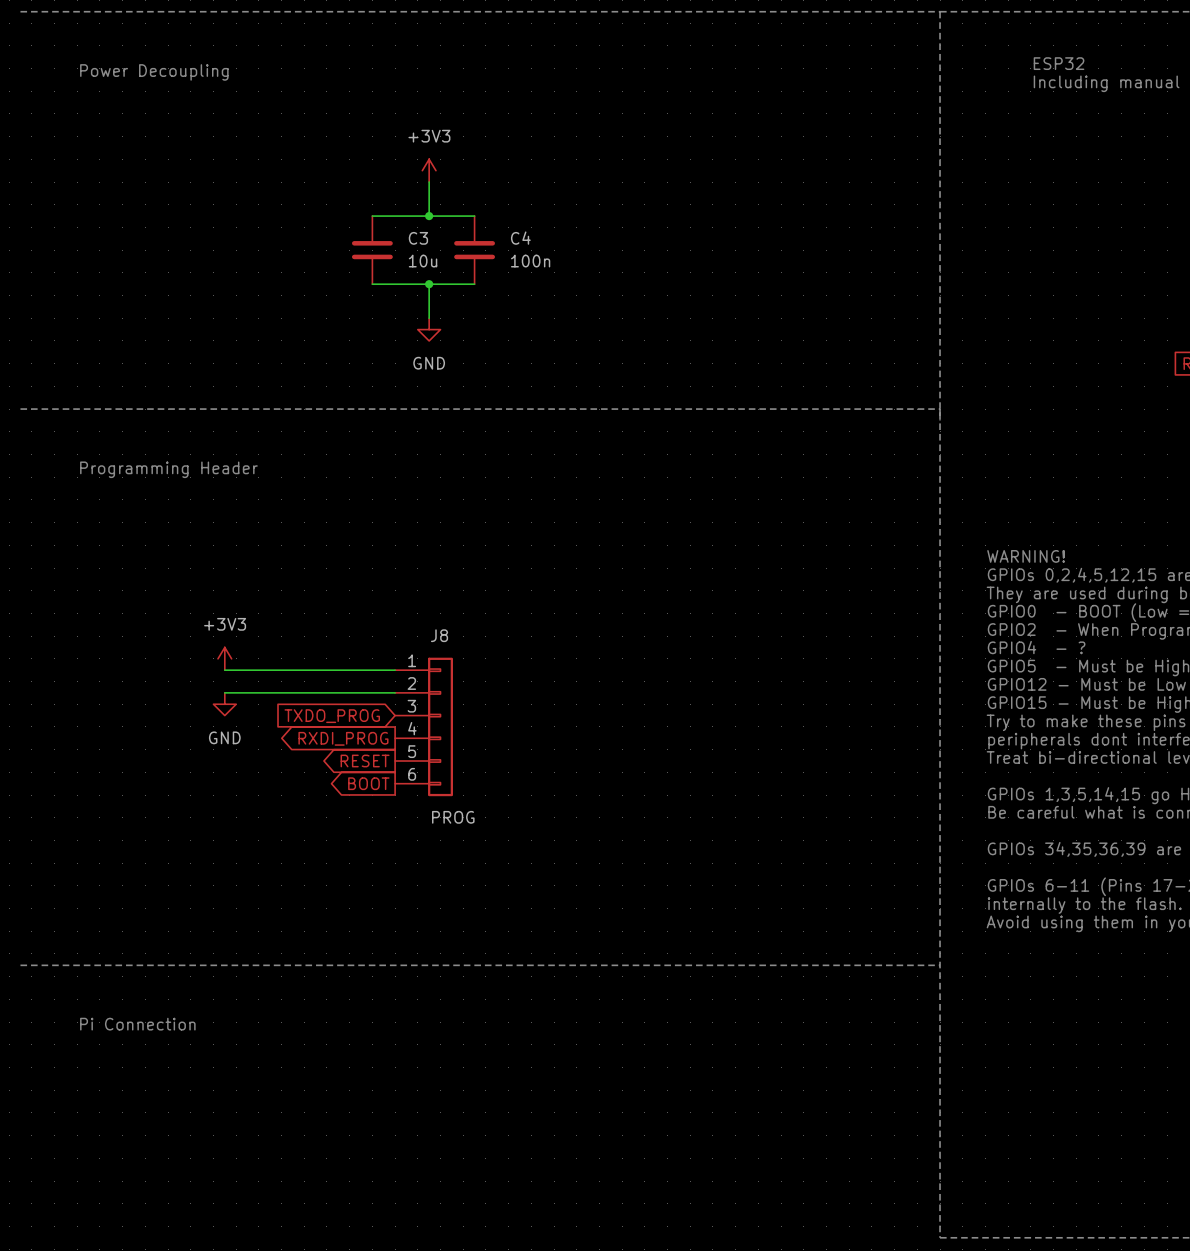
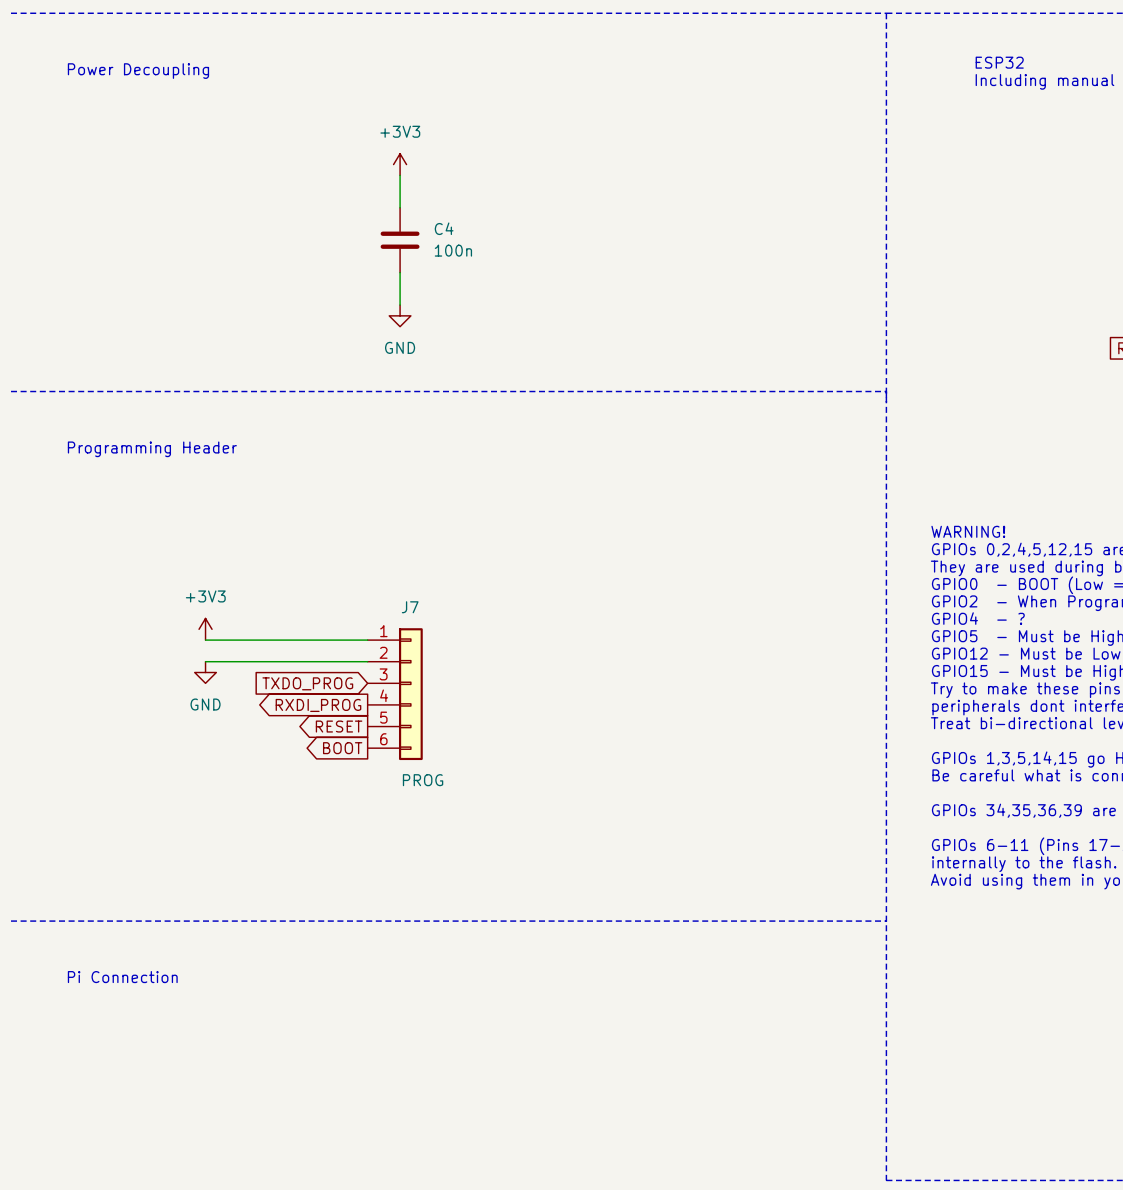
wire: (372, 216) (474, 216) -> none
junction: (429, 216) -> none
C3: 10u (372, 250) -> none
C4 position: (474, 250) -> (400, 240)
wire: (372, 284) (474, 284) -> none
junction: (429, 284) -> none
J8 name: J8 (439, 635) -> J7 (410, 607)

